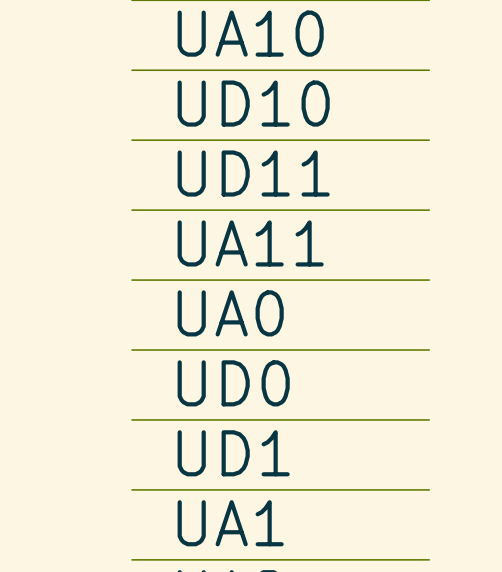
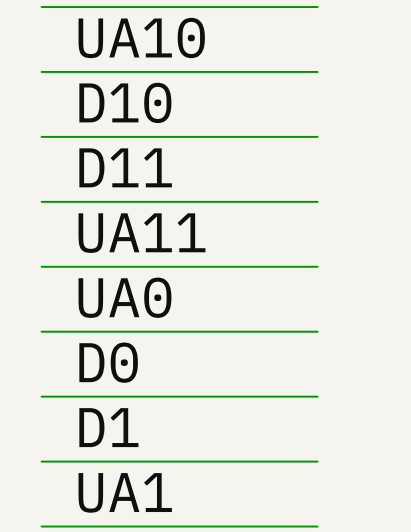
label: UD10 (253, 103) -> D10 (125, 102)
label: UD11 (253, 173) -> D11 (125, 167)
label: UD0 (233, 383) -> D0 (108, 362)
label: UD1 (233, 453) -> D1 (108, 427)

